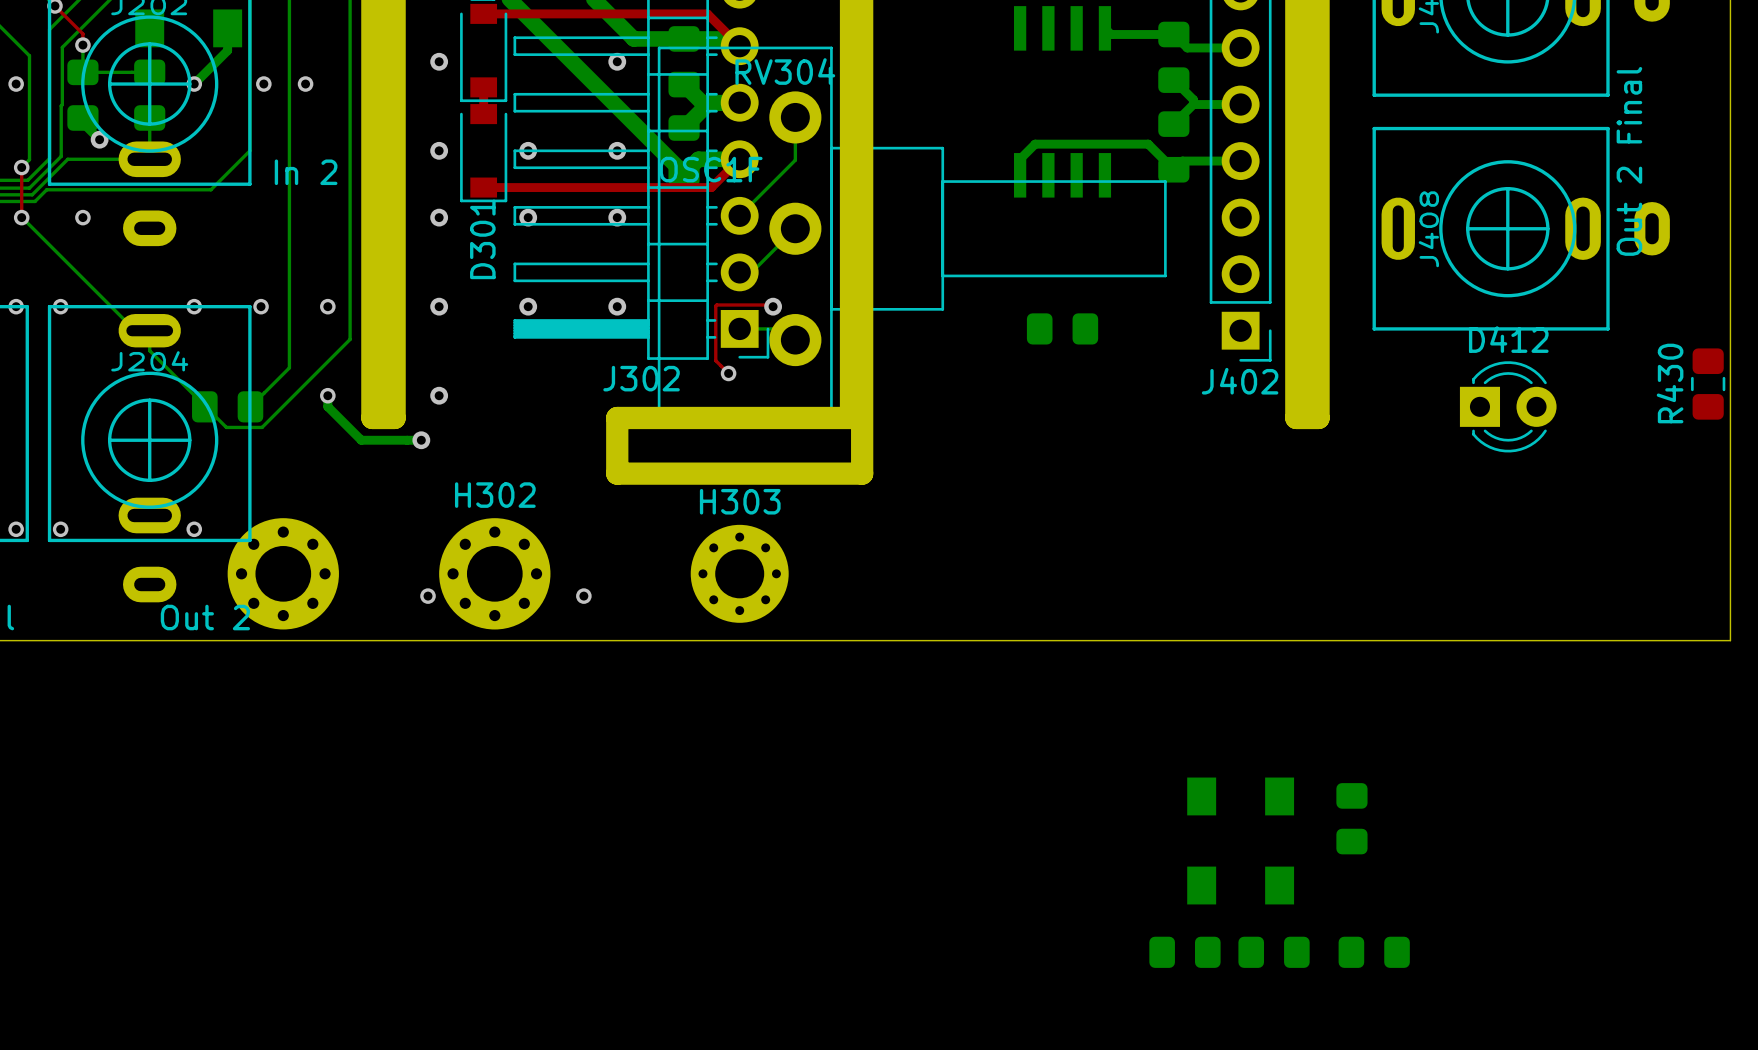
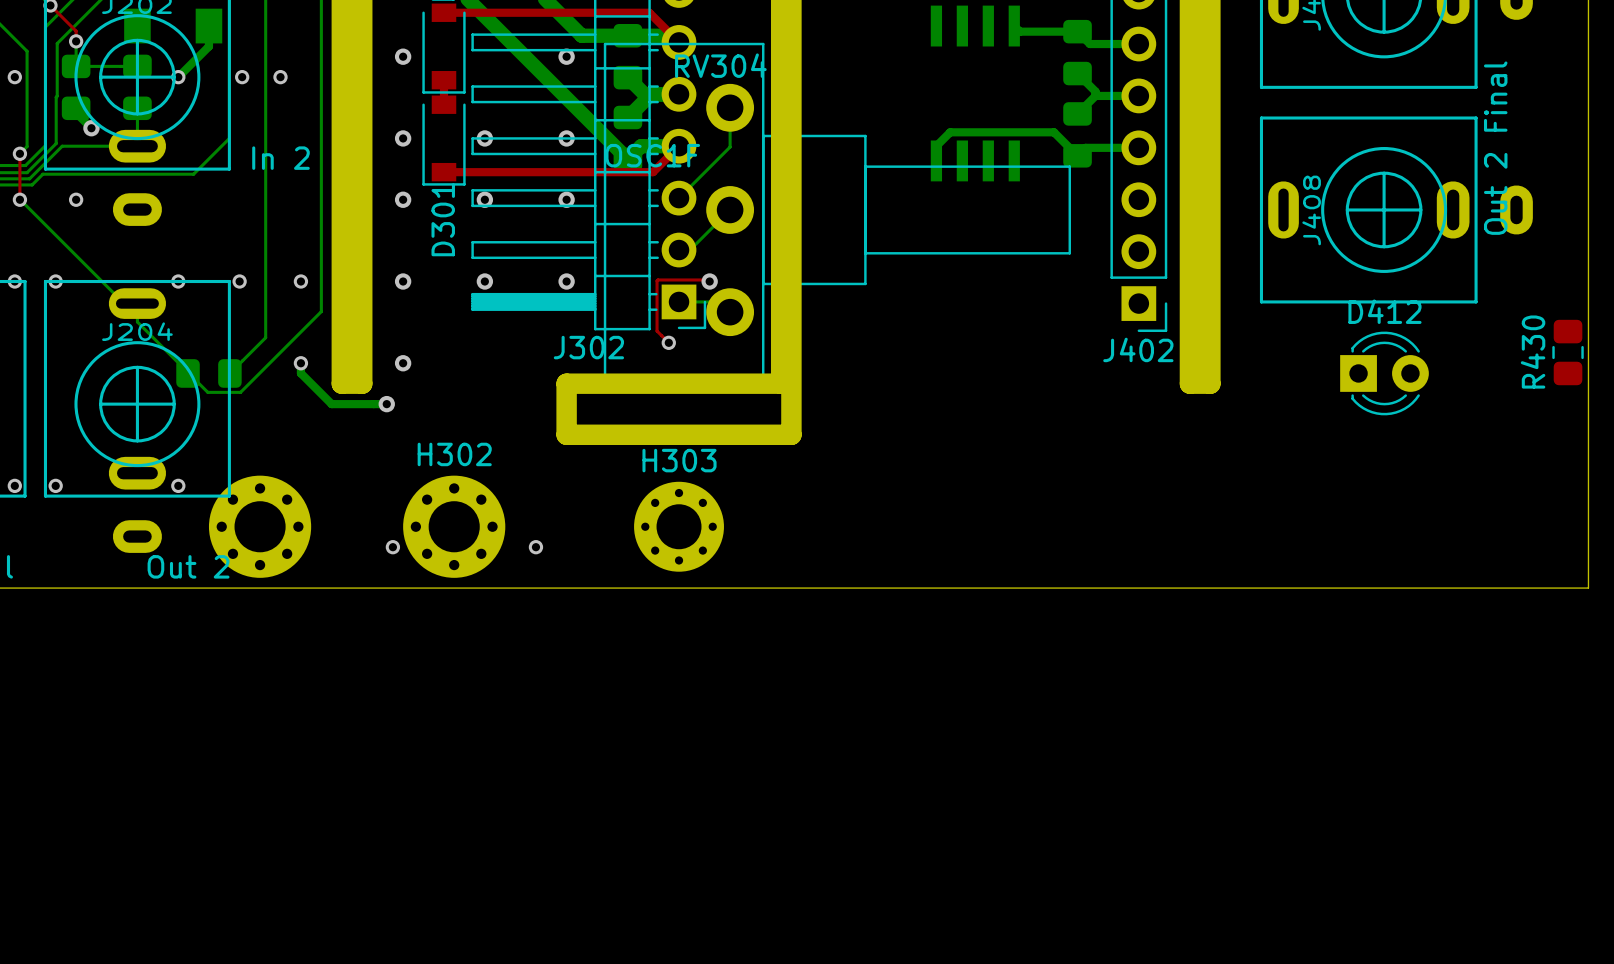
part: (1062, 328) -> none
part: (1240, 796) -> none
part: (1351, 818) -> none
part: (1240, 885) -> none
part: (1184, 952) -> none
part: (1274, 952) -> none
part: (1374, 952) -> none

